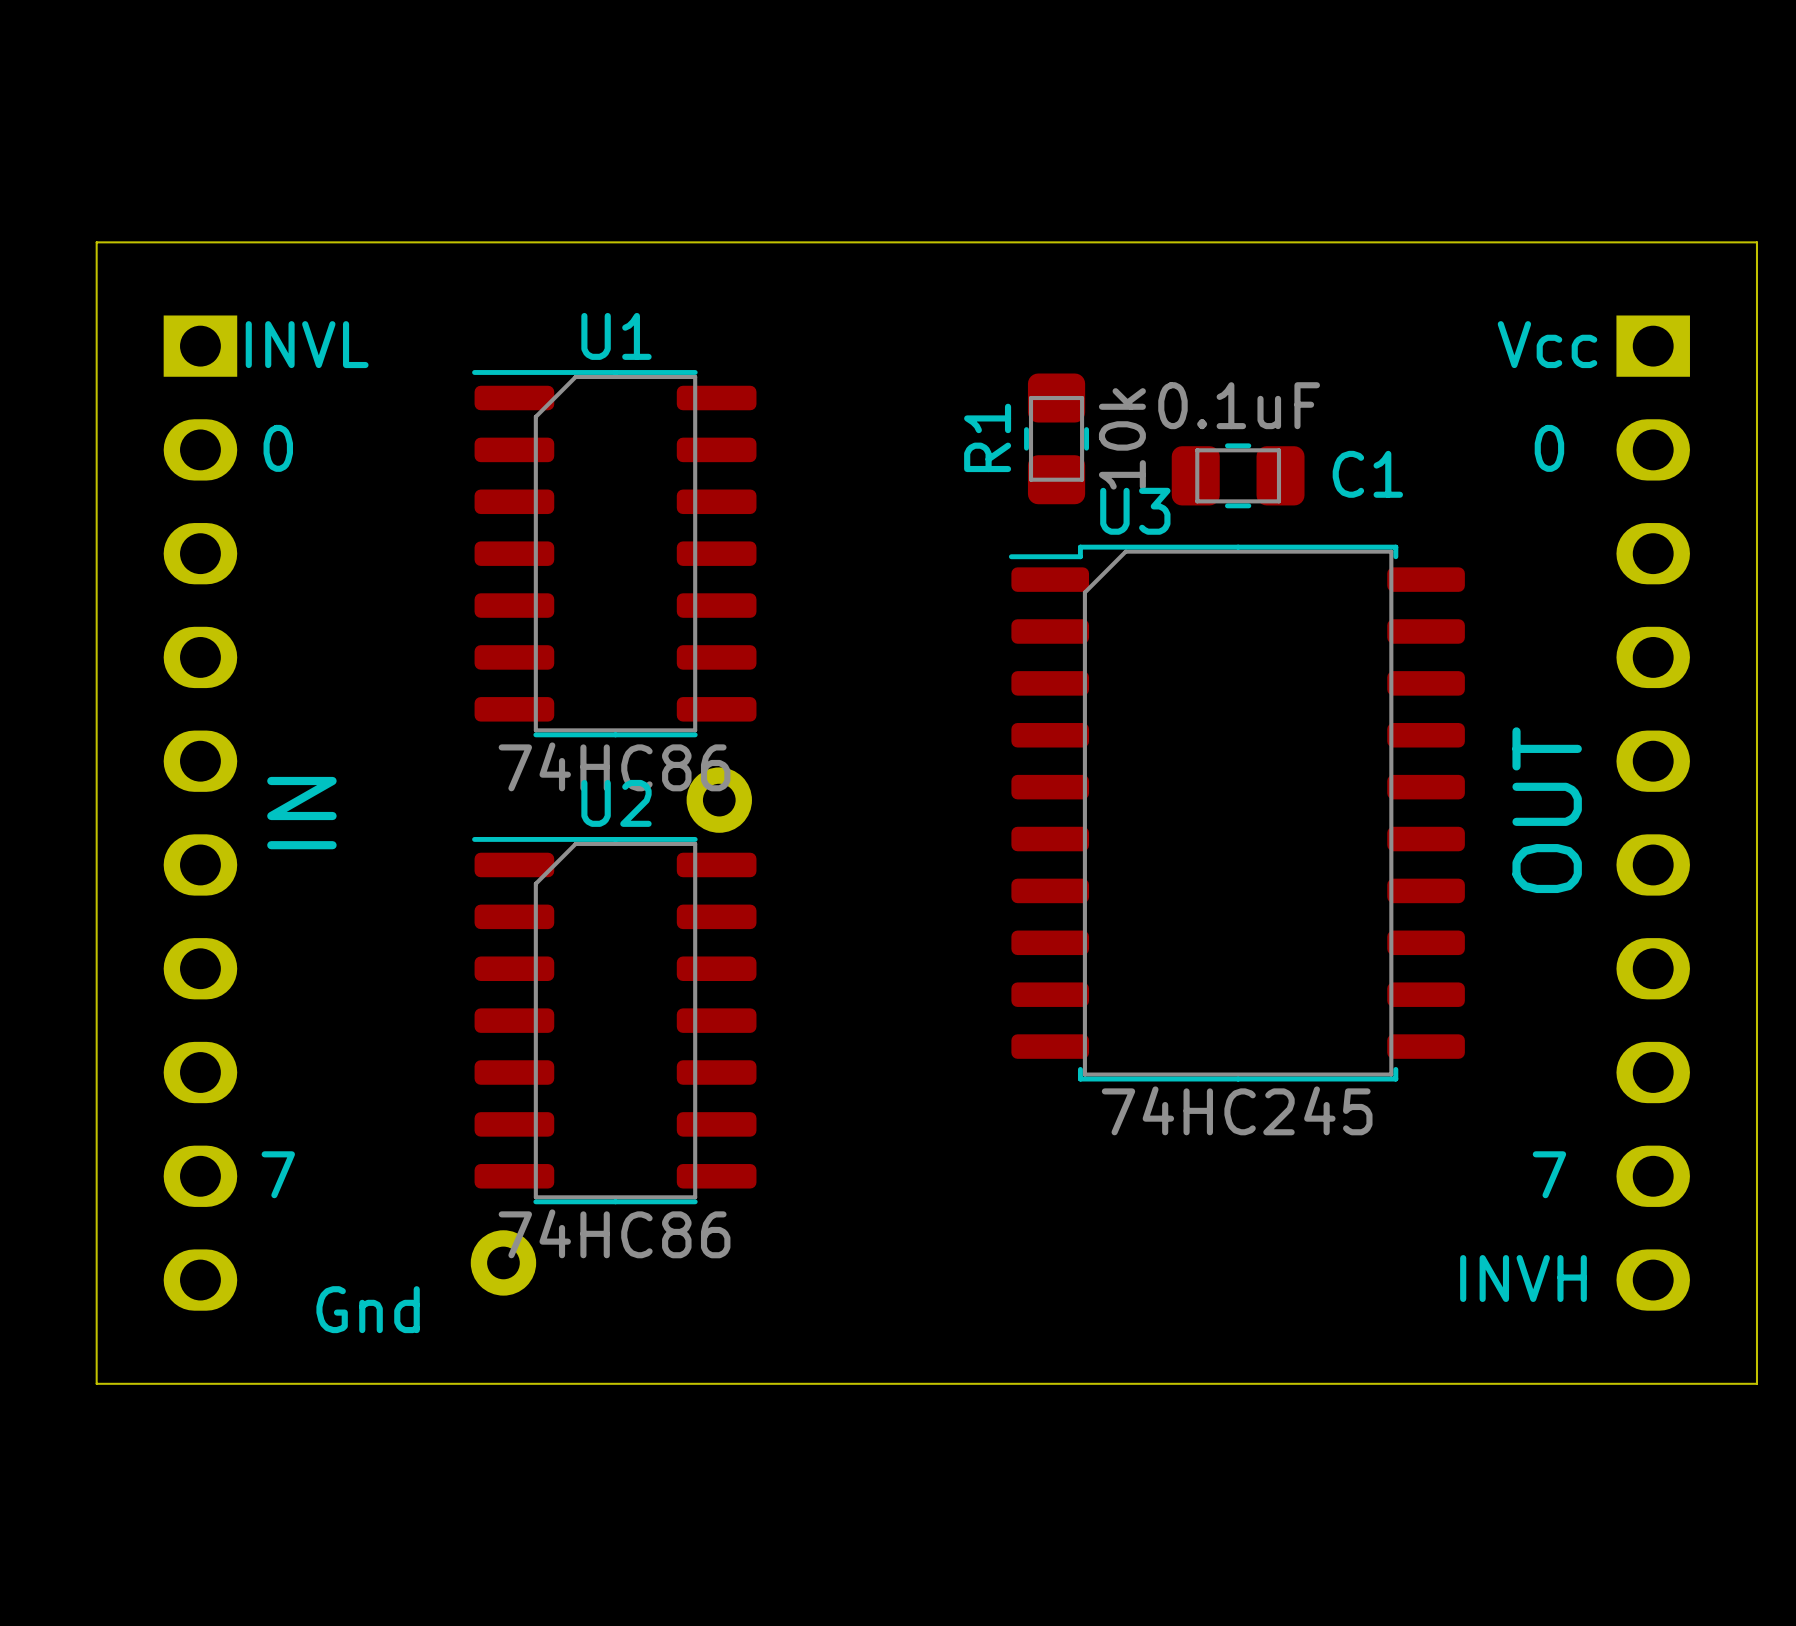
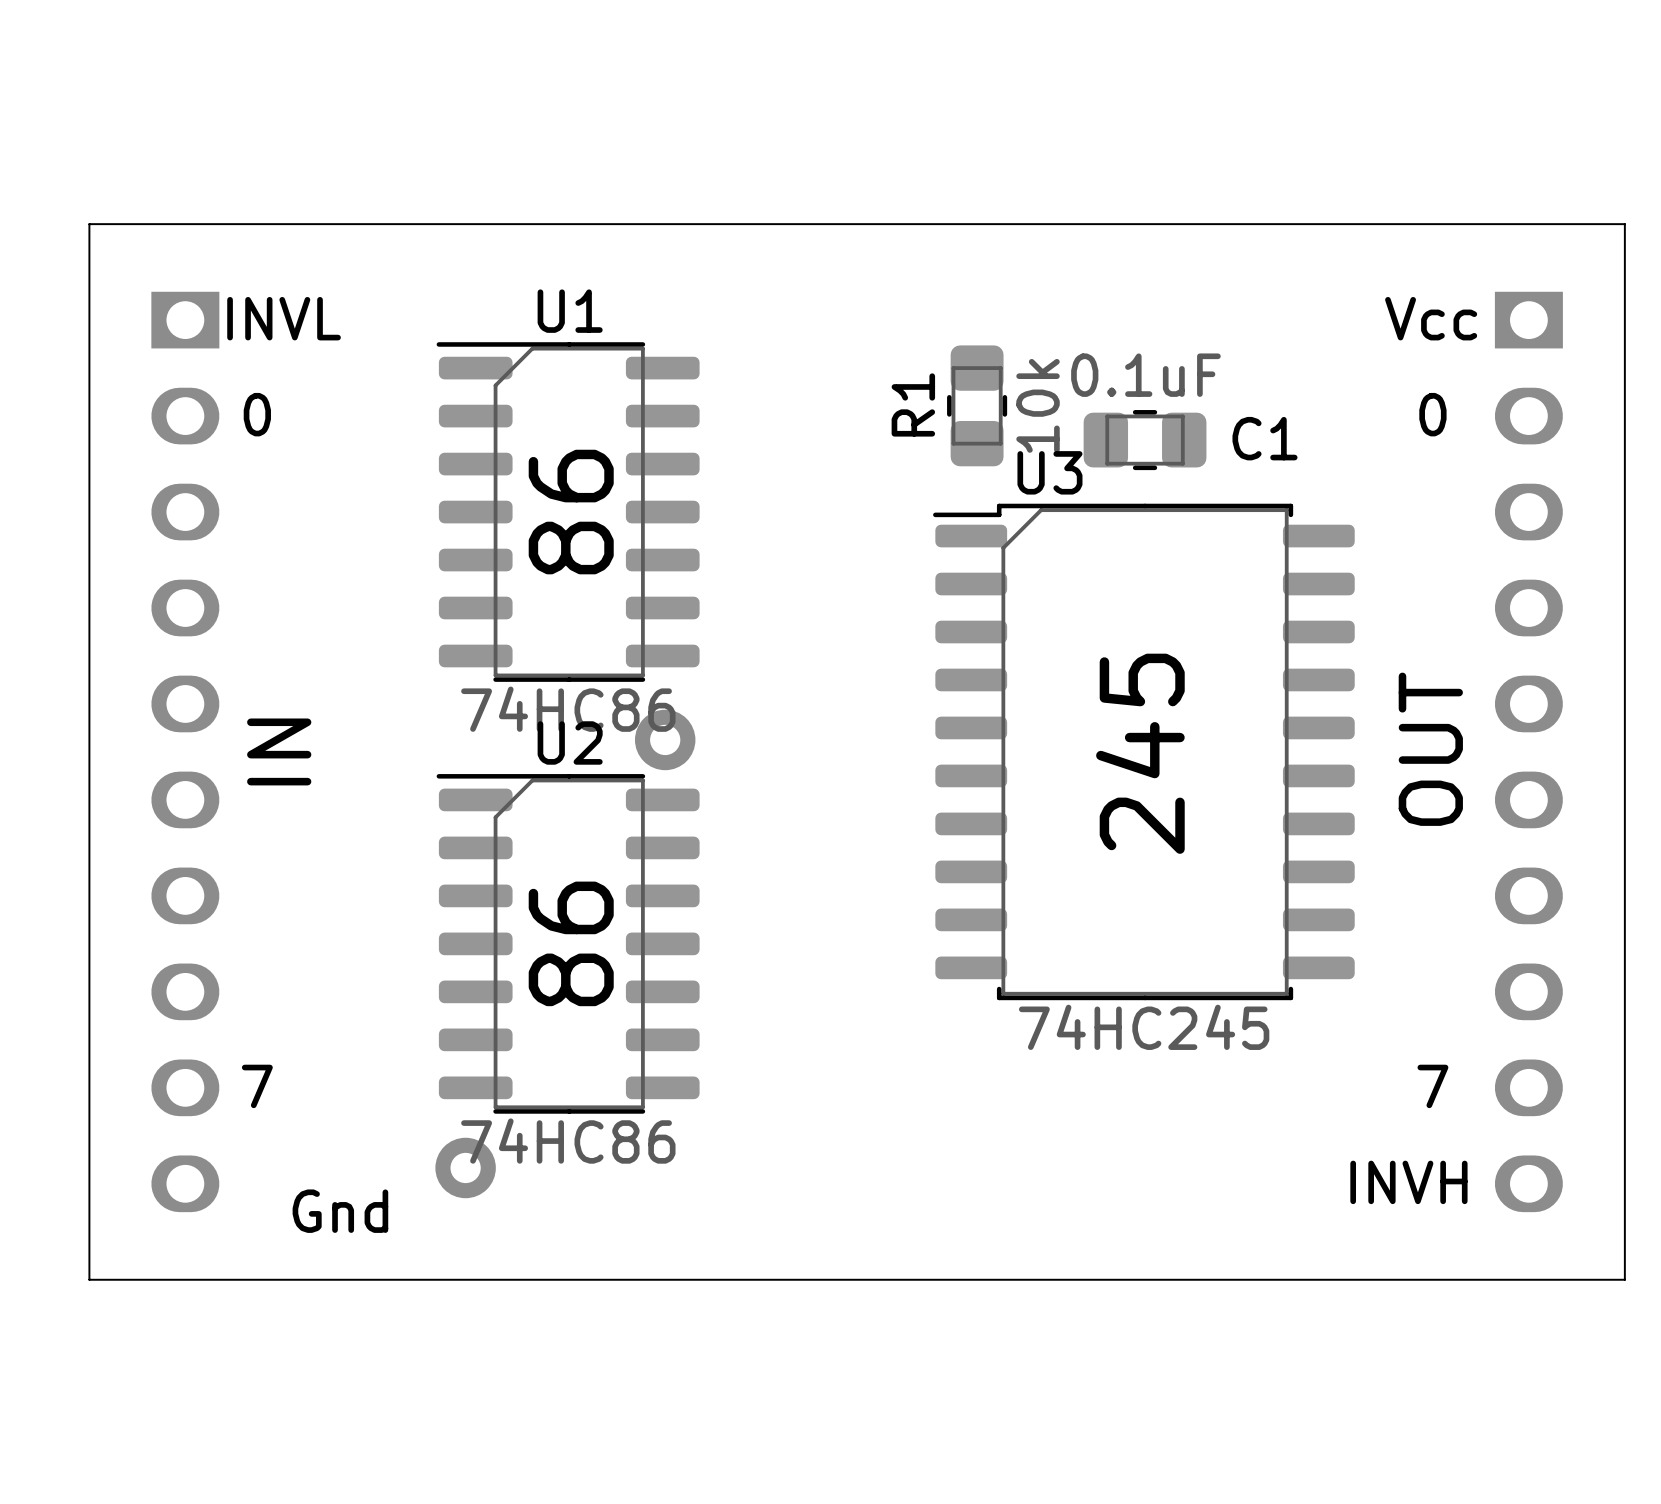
text: none -> 86 (571, 512)
text: none -> 245 (1140, 753)
text: none -> 86 (571, 943)

